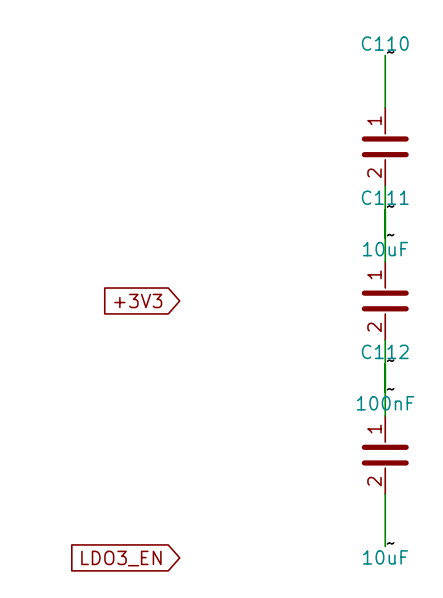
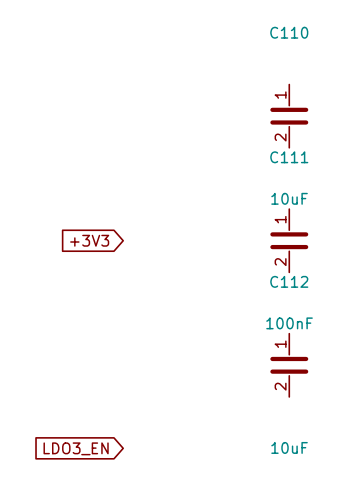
label: ~ (390, 52) -> none
wire: (385, 55) (385, 107) -> none
wire: (385, 185) (385, 261) -> none
label: ~ (390, 206) -> none
label: ~ (390, 235) -> none
wire: (385, 340) (385, 415) -> none
label: ~ (390, 360) -> none
label: ~ (390, 389) -> none
wire: (385, 494) (385, 546) -> none
label: ~ (390, 543) -> none

